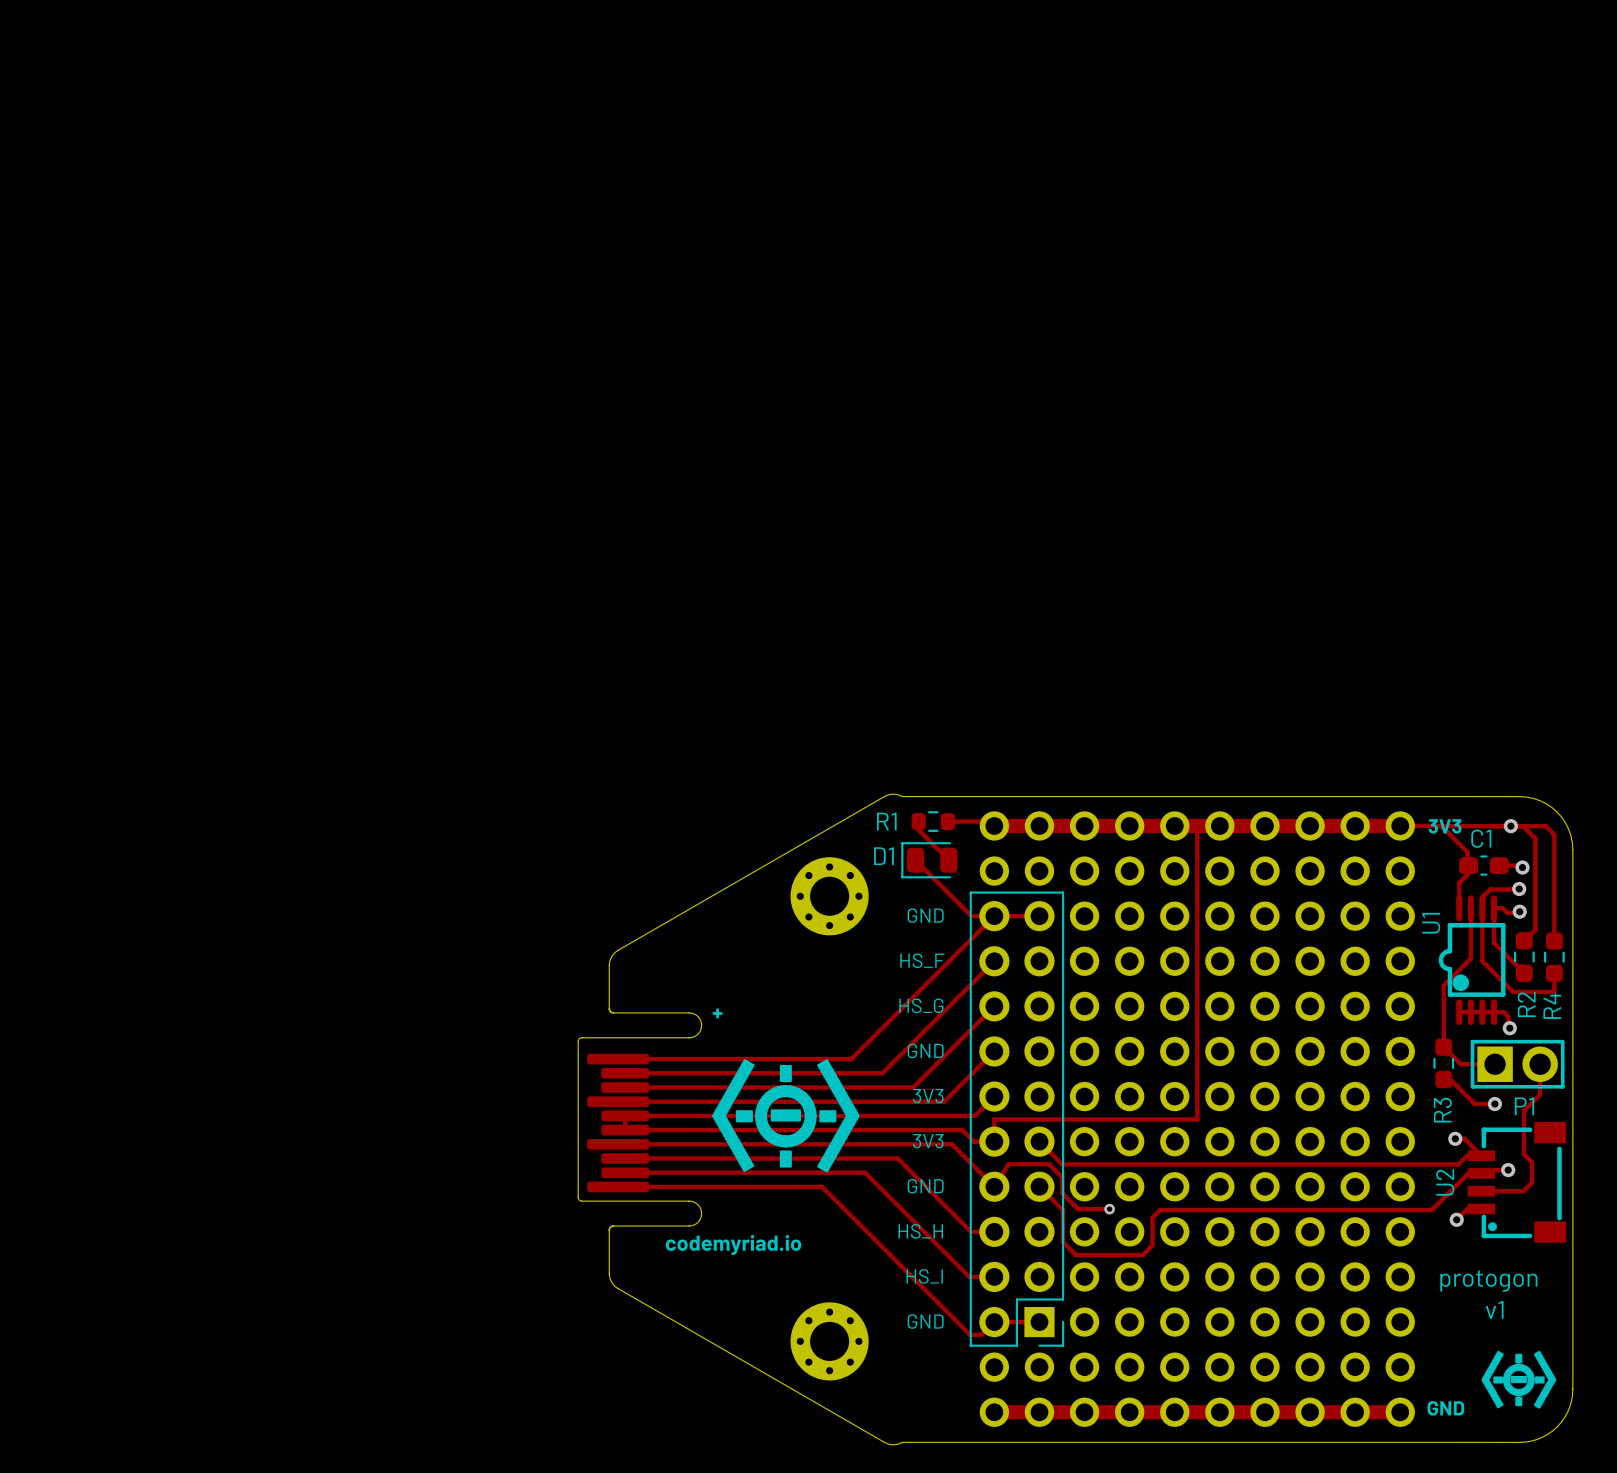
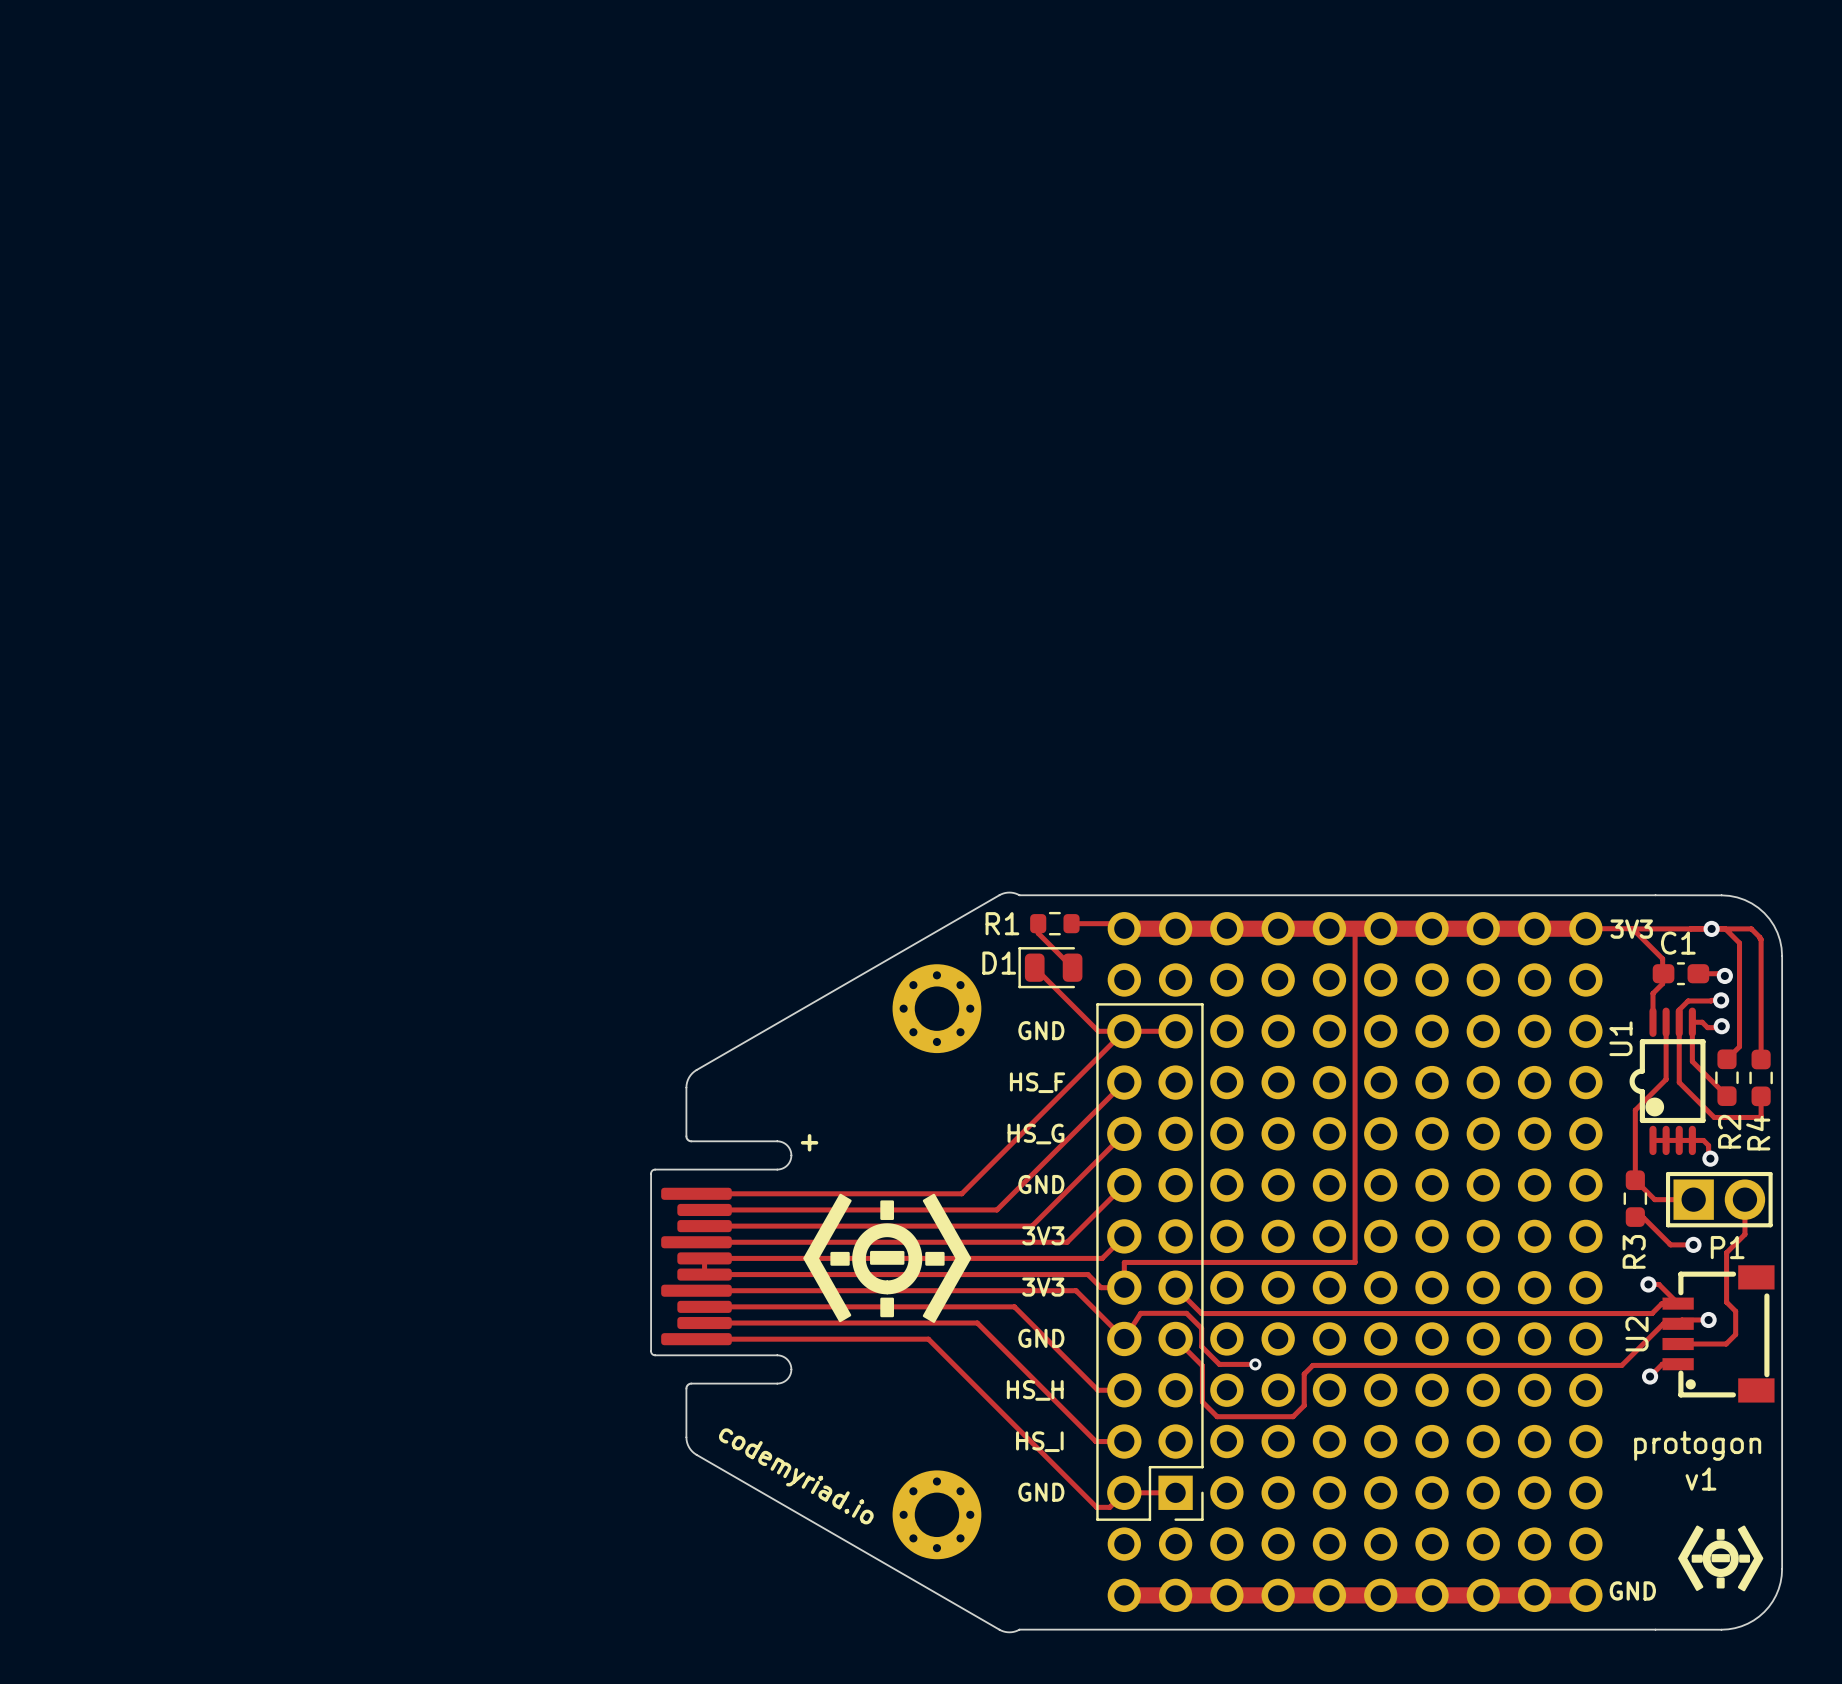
text rotation: 0° (733, 1245) -> 30° clockwise (796, 1476)

